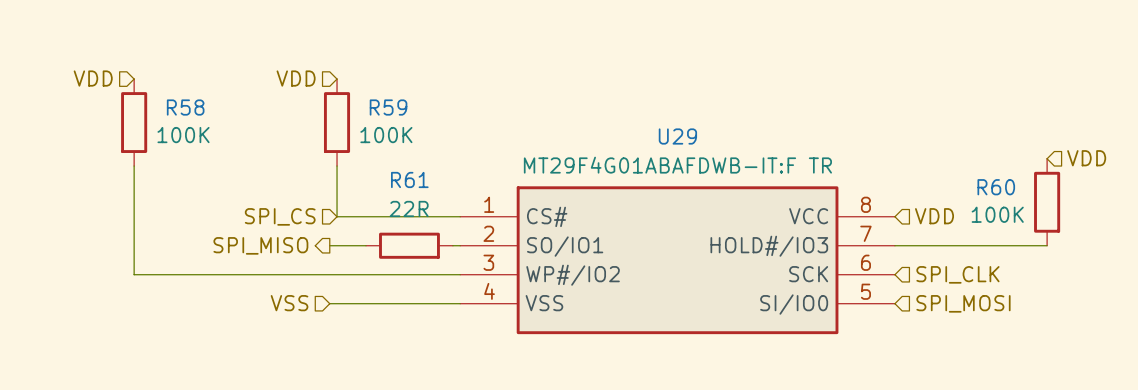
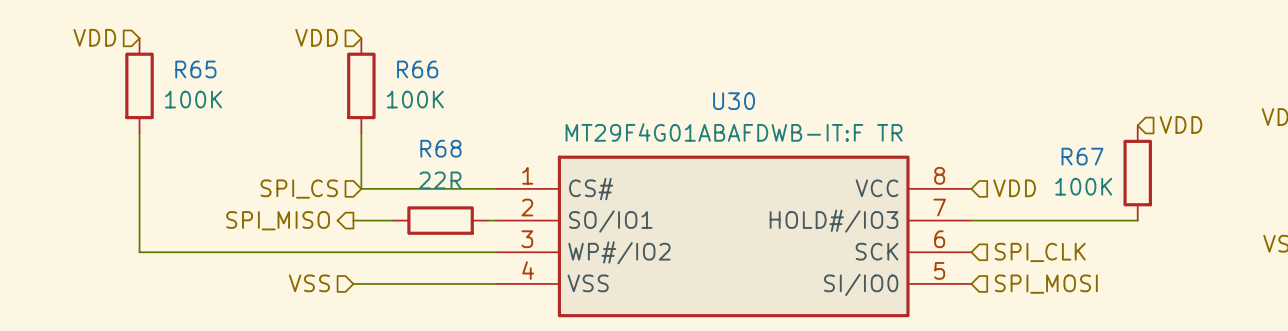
R58 name: R58 (185, 107) -> R65 (195, 69)
R59 name: R59 (388, 107) -> R66 (417, 69)
U29 name: U29 (677, 136) -> U30 (734, 101)
R61 name: R61 (409, 179) -> R68 (440, 148)
R60 name: R60 (996, 187) -> R67 (1082, 156)

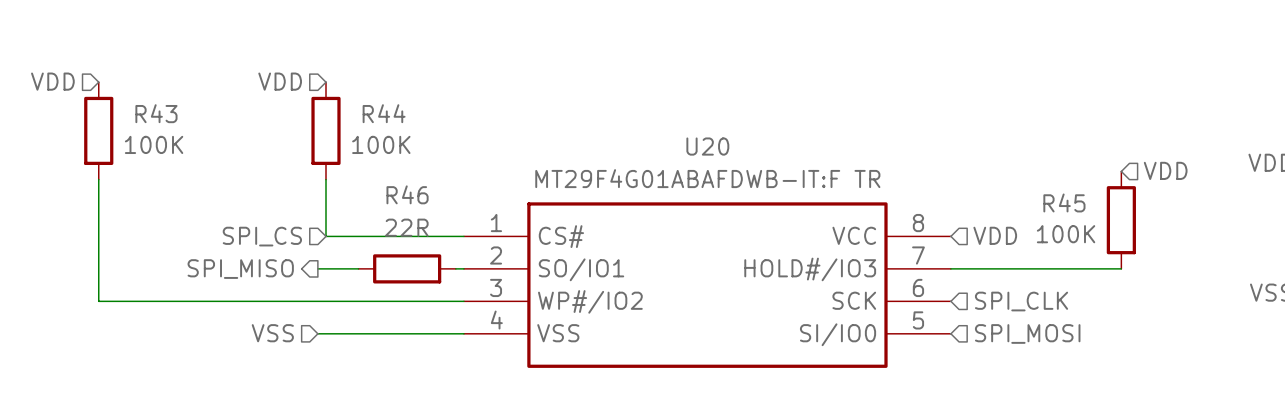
R65 name: R65 (195, 69) -> R43 (156, 113)
R66 name: R66 (417, 69) -> R44 (384, 113)
U30 name: U30 (734, 101) -> U20 (707, 146)
R68 name: R68 (440, 148) -> R46 (407, 194)
R67 name: R67 (1082, 156) -> R45 (1064, 202)

